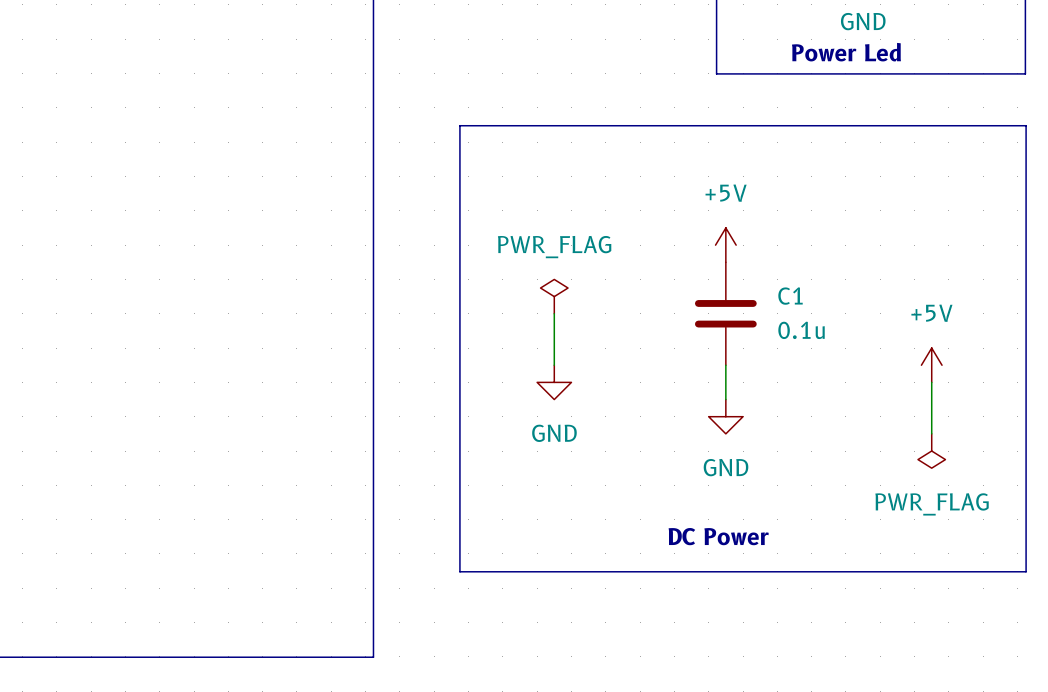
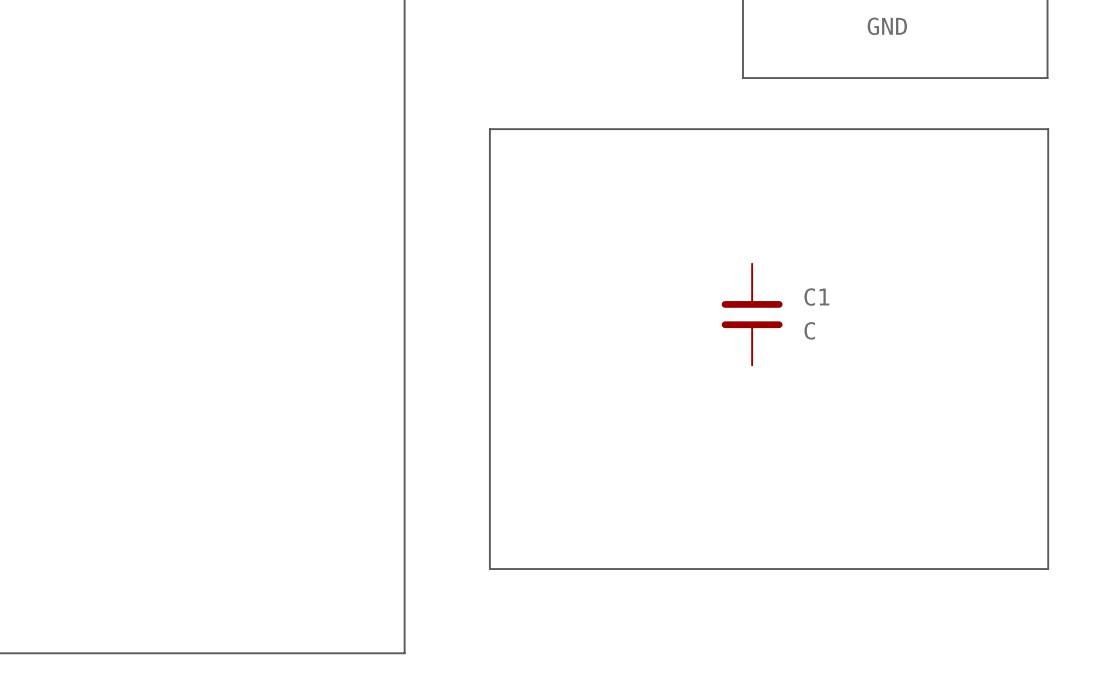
text: Power Led (846, 52) -> none
power symbol: +5V (725, 245) -> none
power symbol: PWR_FLAG (554, 296) -> none
wire: (554, 313) (554, 365) -> none
C1 value: 0.1u (801, 330) -> C (809, 330)
wire: (725, 365) (725, 399) -> none
power symbol: +5V (931, 365) -> none
power symbol: GND (554, 382) -> none
wire: (931, 382) (931, 433) -> none
power symbol: GND (725, 416) -> none
power symbol: PWR_FLAG (931, 451) -> none
text: DC Power (718, 536) -> none

